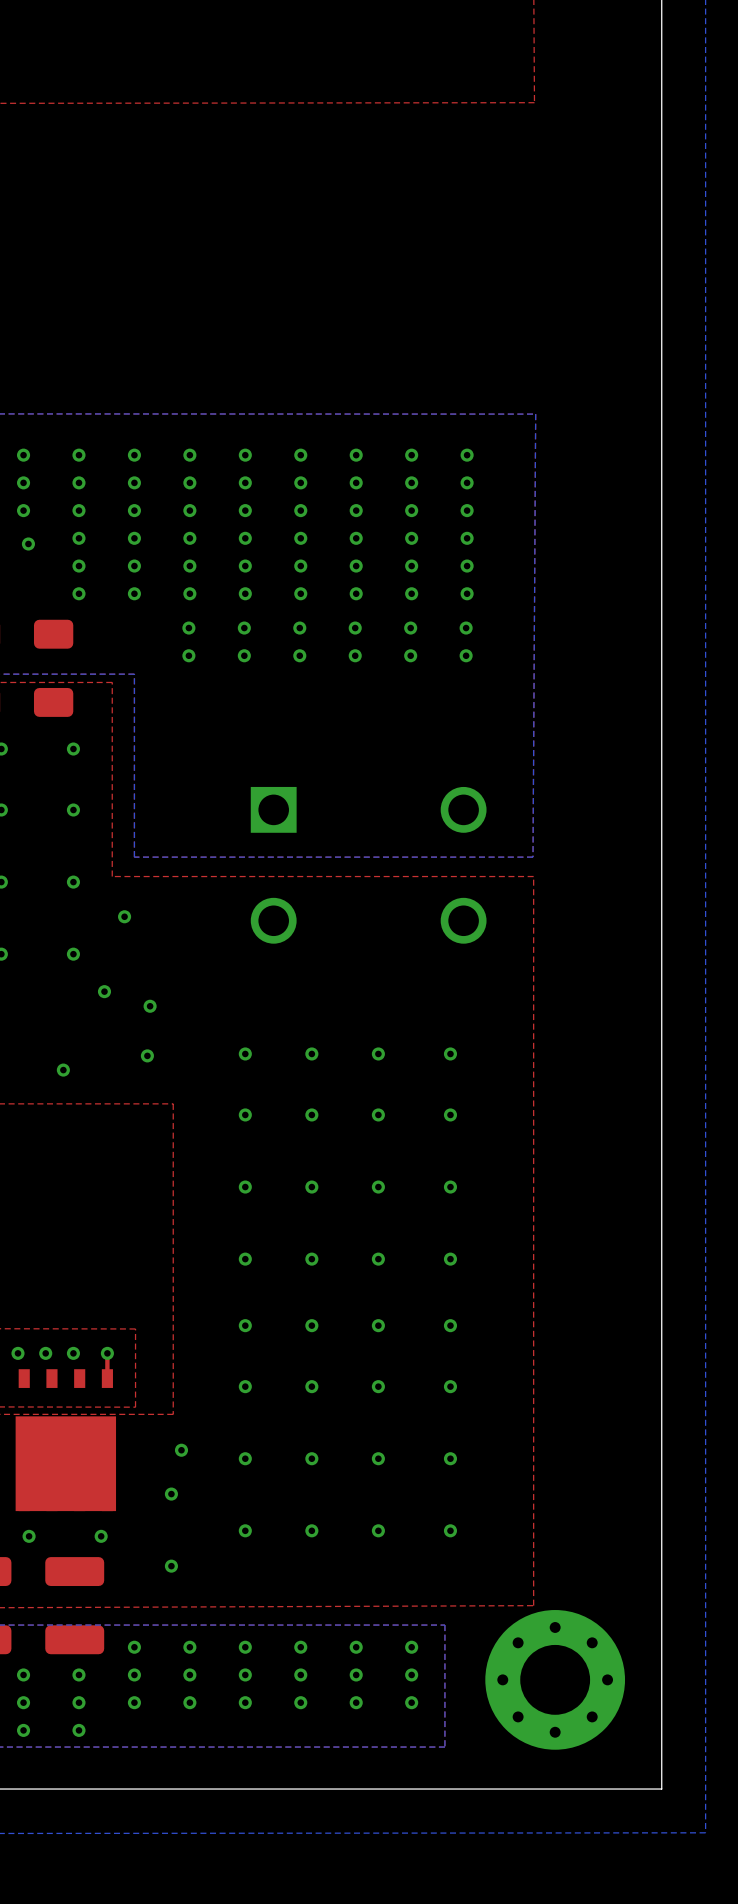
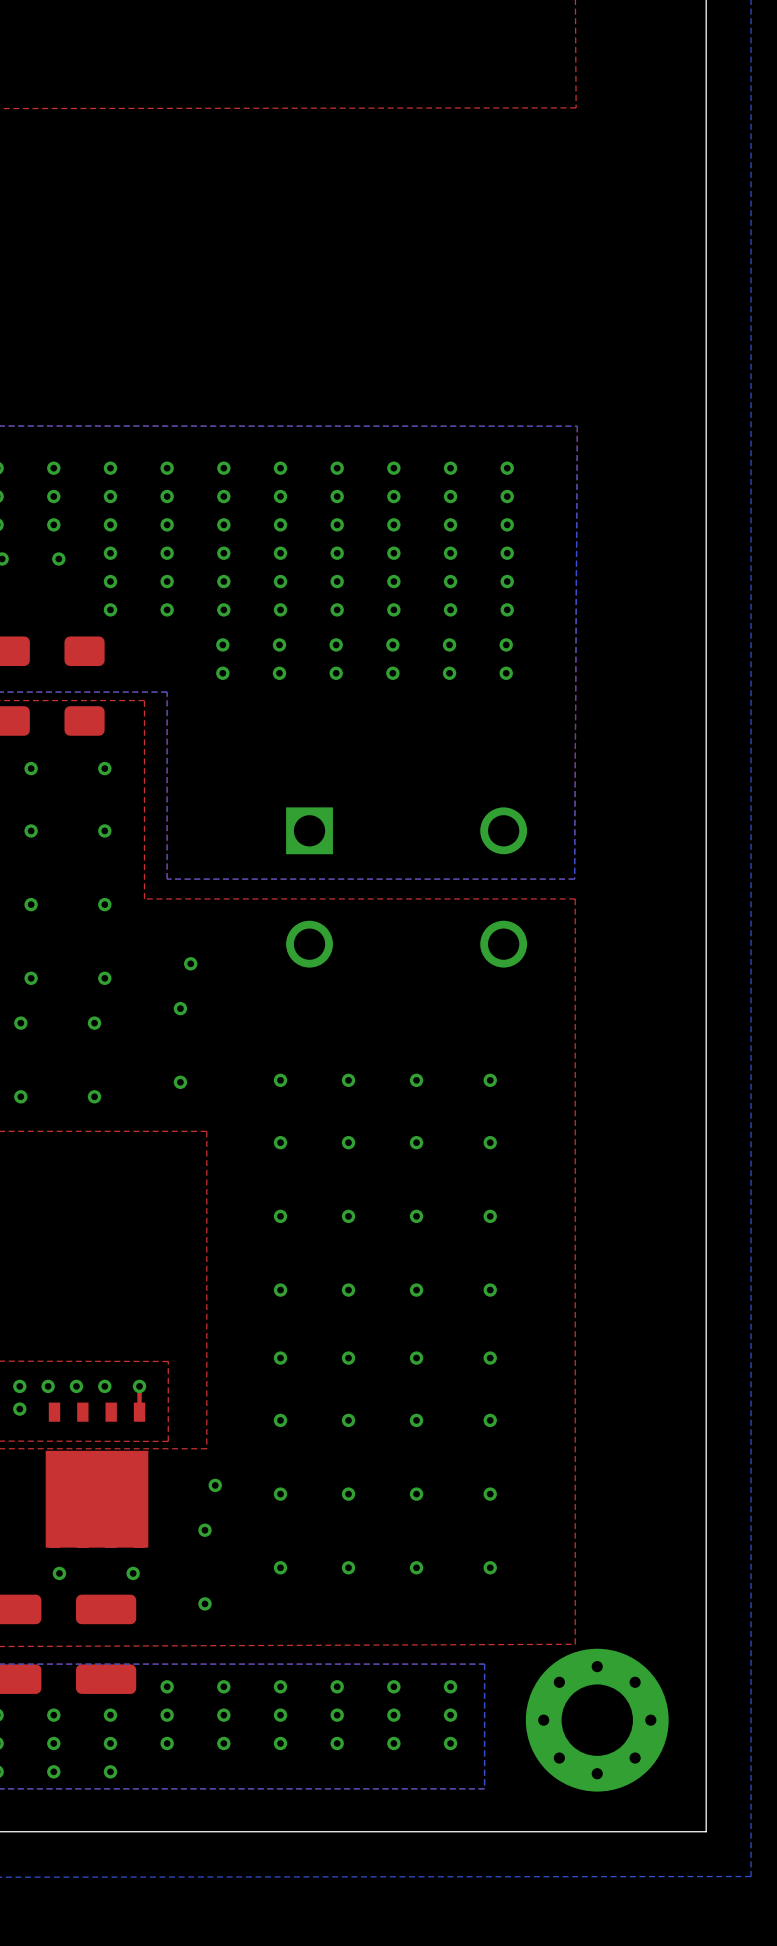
via: (124, 916) -> none
via: none -> (190, 963)
via: none -> (180, 1008)
via: (104, 991) -> none
via: none -> (94, 1023)
via: (150, 1006) -> none

